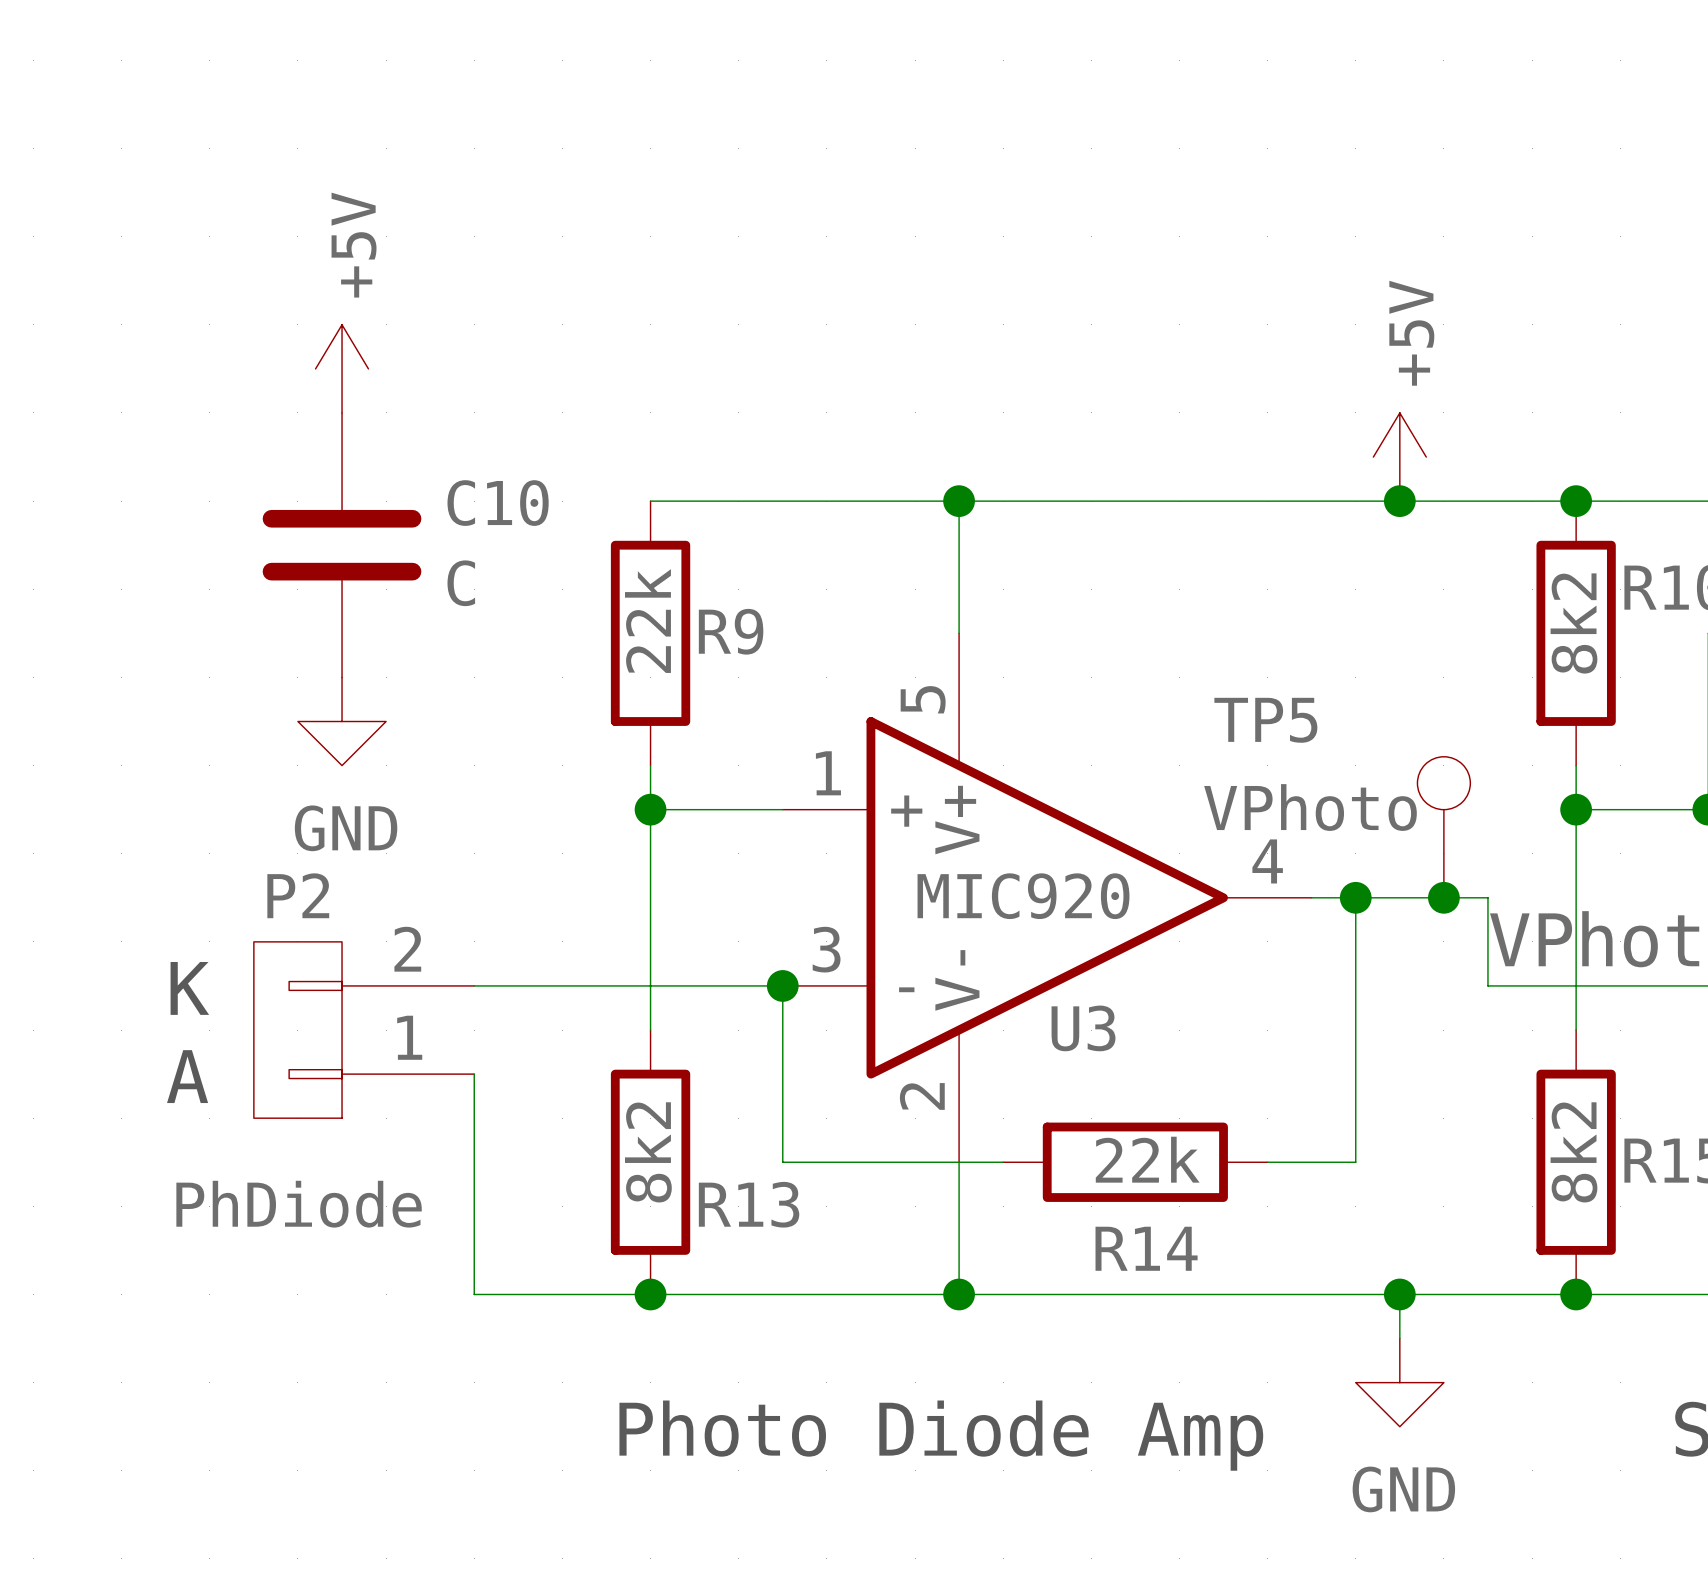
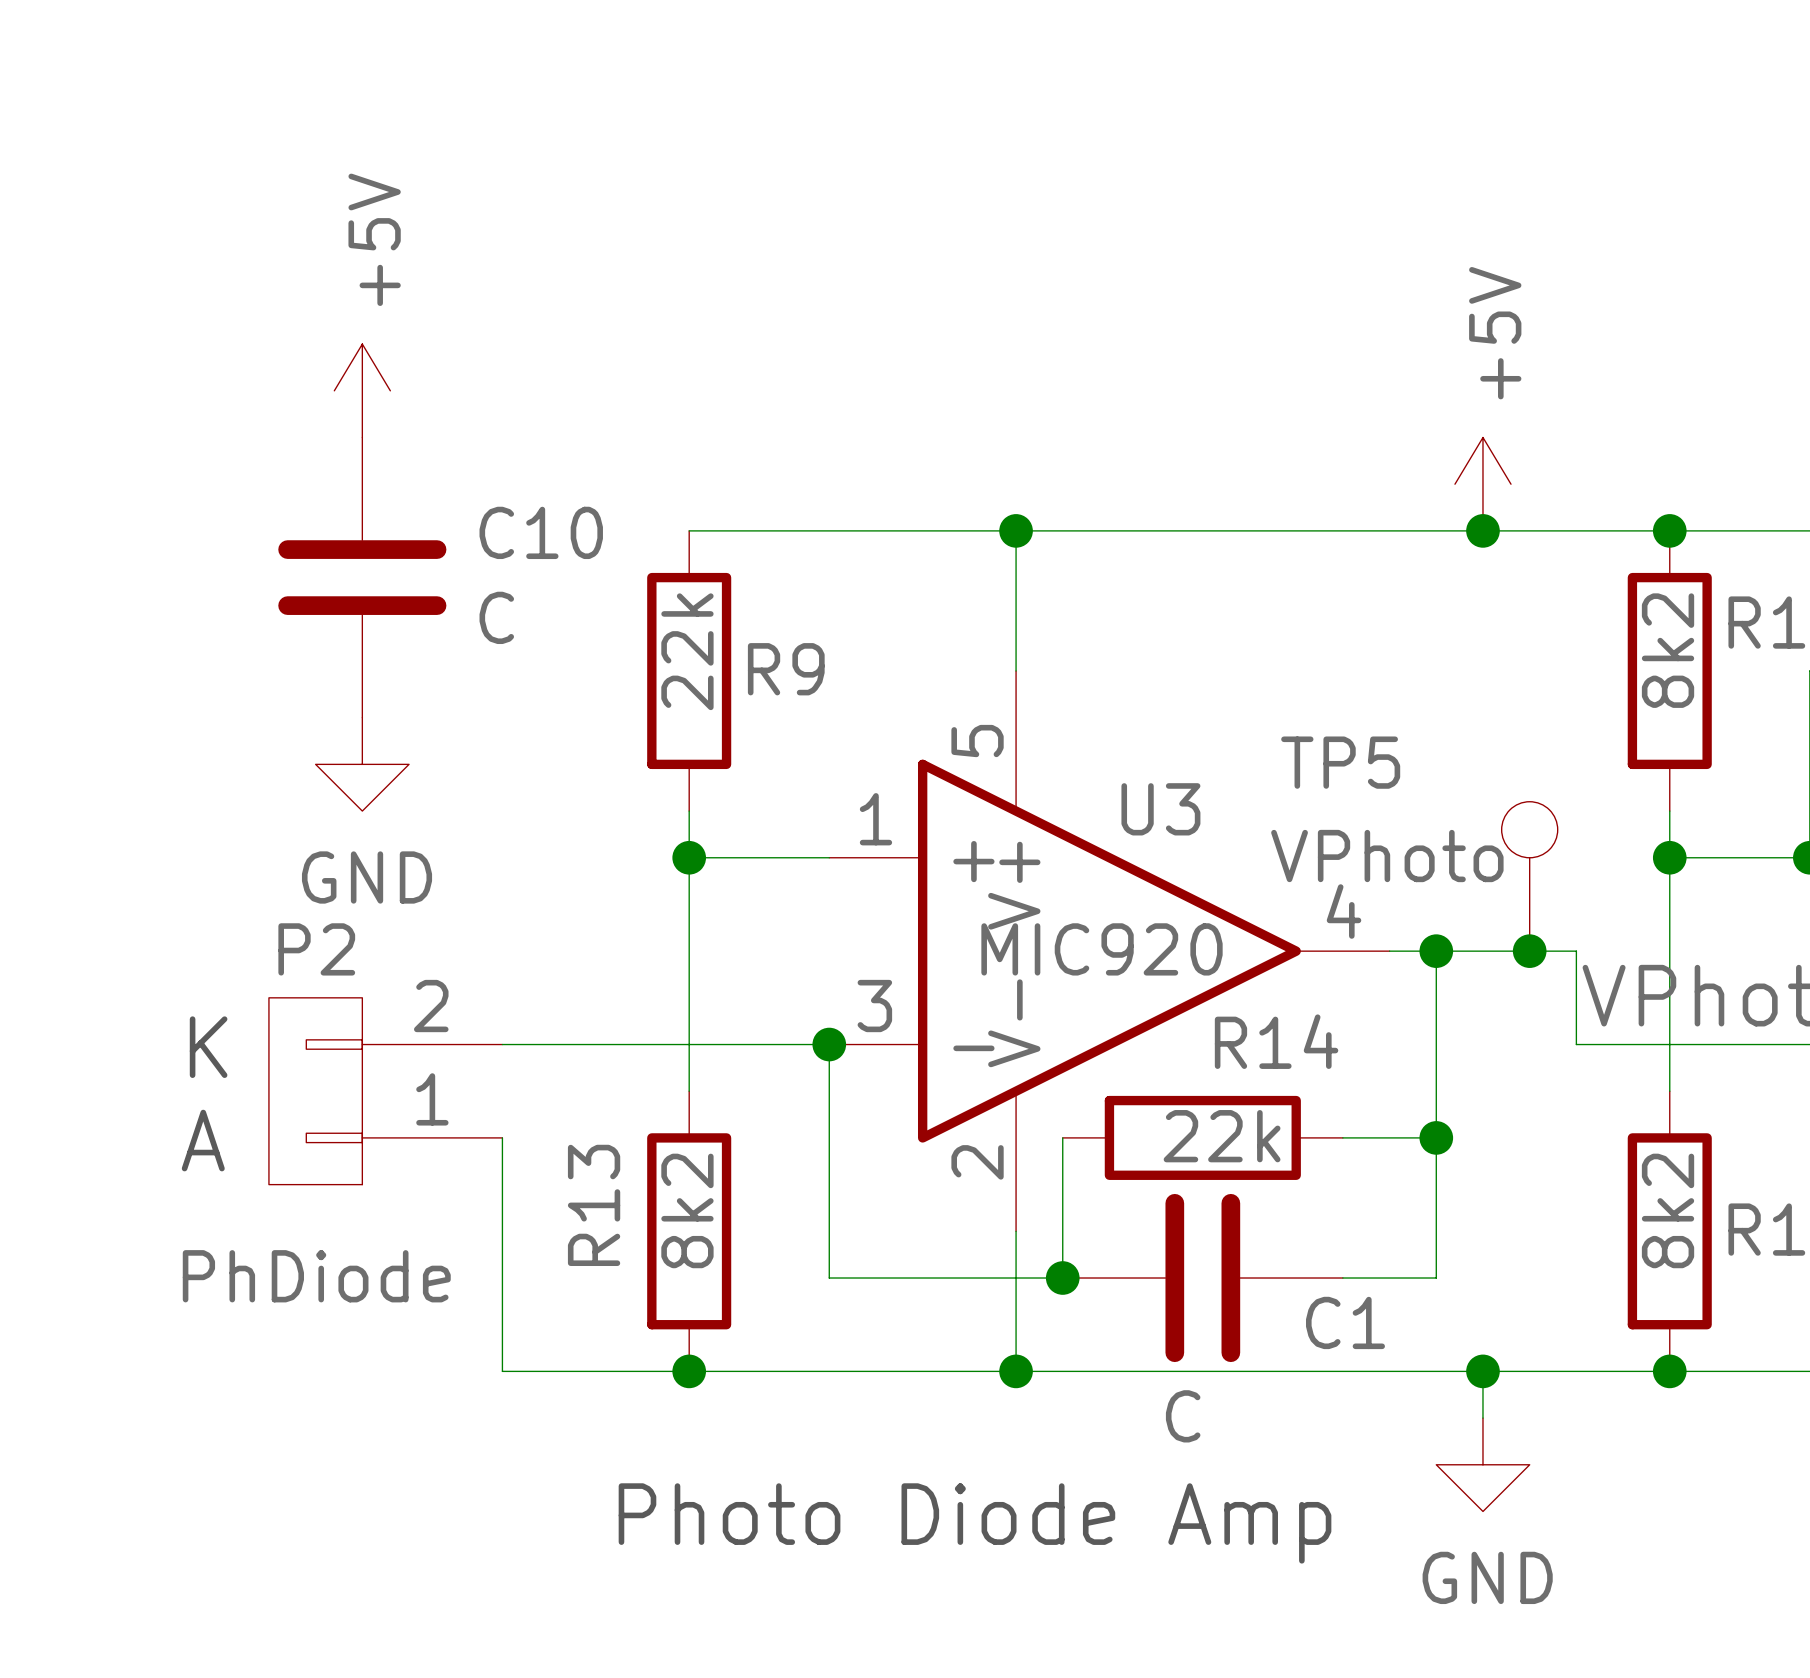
U3 name position: U3 (1083, 1028) -> U3 (1160, 809)
wire: none -> (1342, 1137) (1436, 1137)
junction: none -> (1436, 1137)
wire: (782, 1162) (1003, 1162) -> (829, 1231) (829, 1278) (1062, 1278) (1062, 1137)
R14 position: (1135, 1162) -> (1202, 1137)
wire: (1267, 1162) (1355, 1162) -> (1342, 1278) (1436, 1278) (1436, 1231)
R13 name rotation: 0° (749, 1204) -> 90° counterclockwise (594, 1205)
R13 name position: R13 (749, 1204) -> R13 (594, 1205)
junction: none -> (1062, 1278)
C1: none -> C (1202, 1278)
R14 name position: R14 (1146, 1248) -> R14 (1276, 1041)

